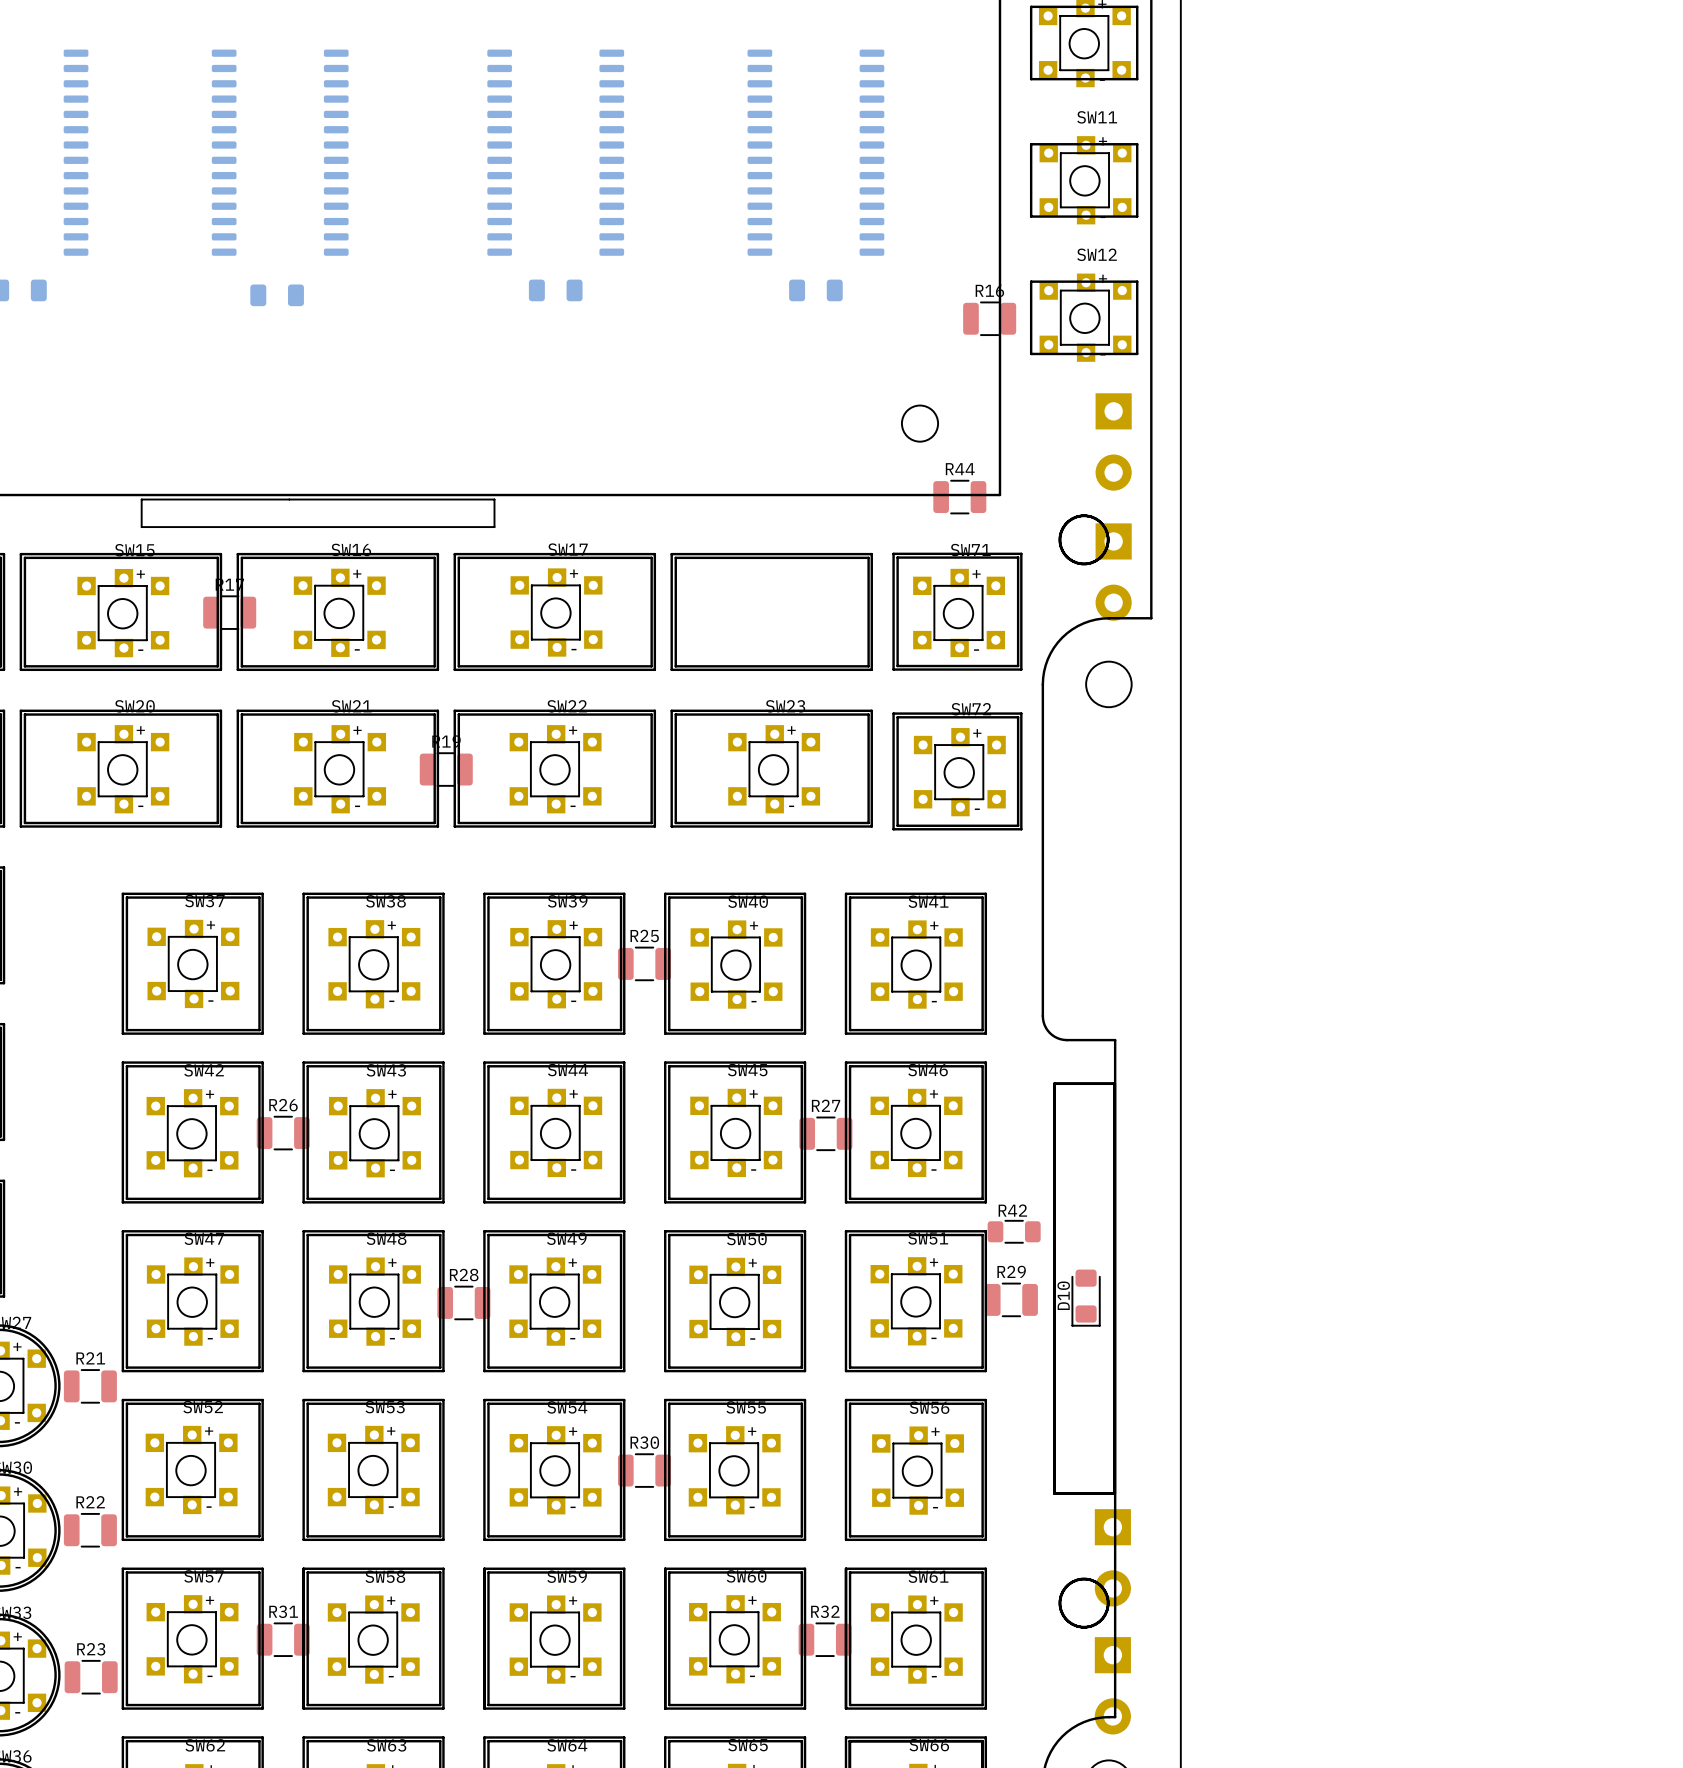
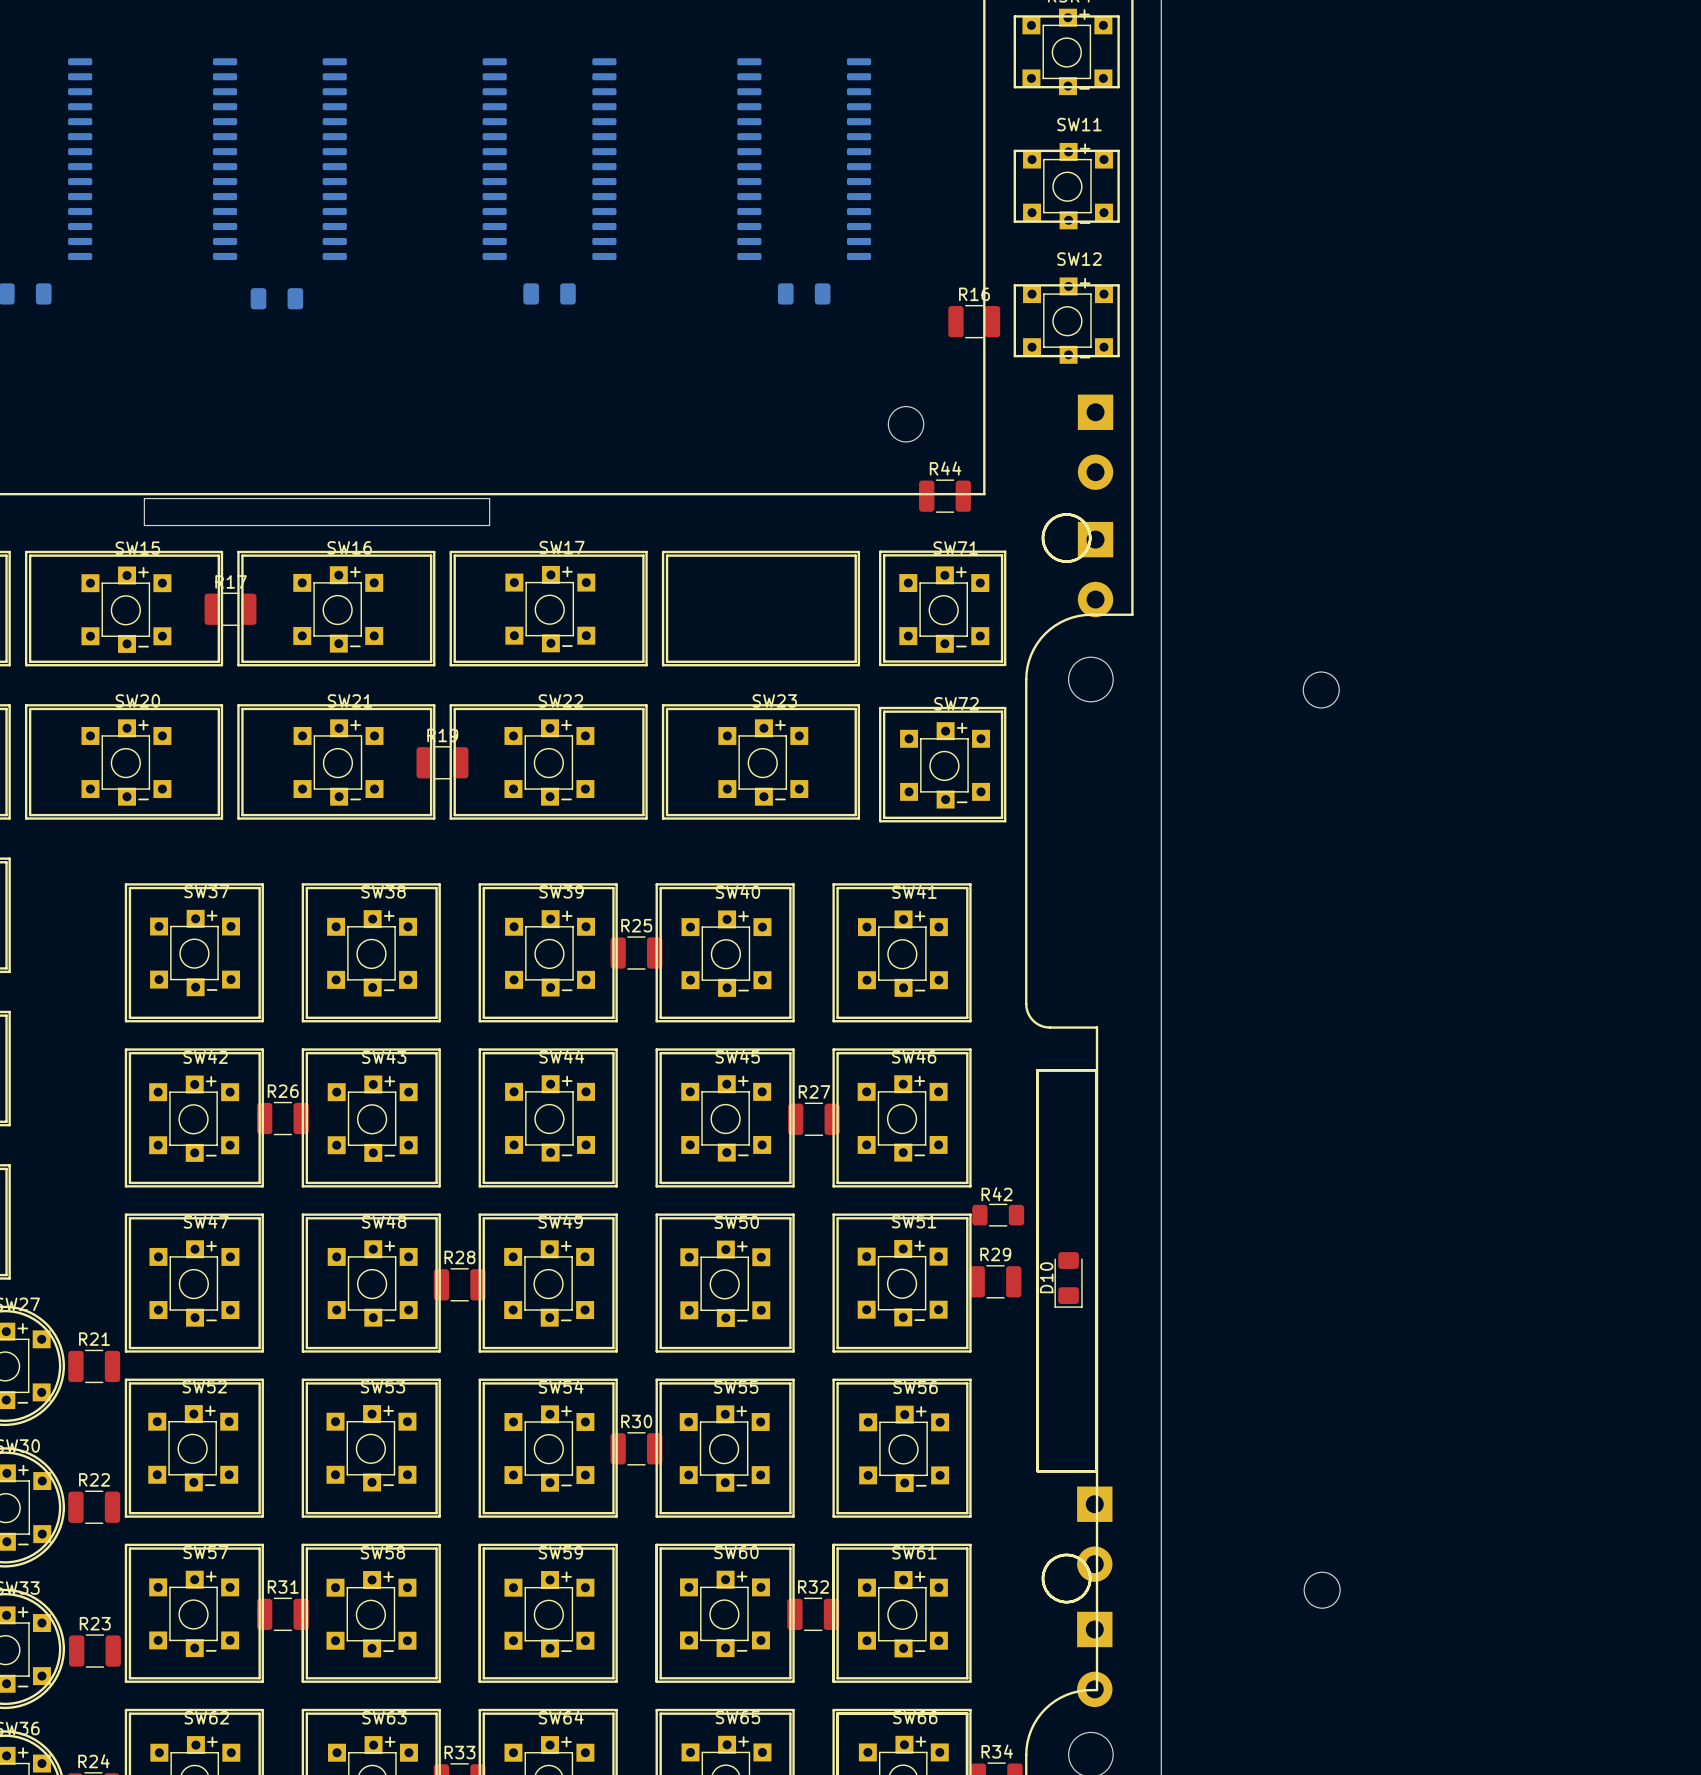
round board edge: none -> [1303, 671, 1340, 709]
round board edge: none -> [1303, 1571, 1341, 1609]

